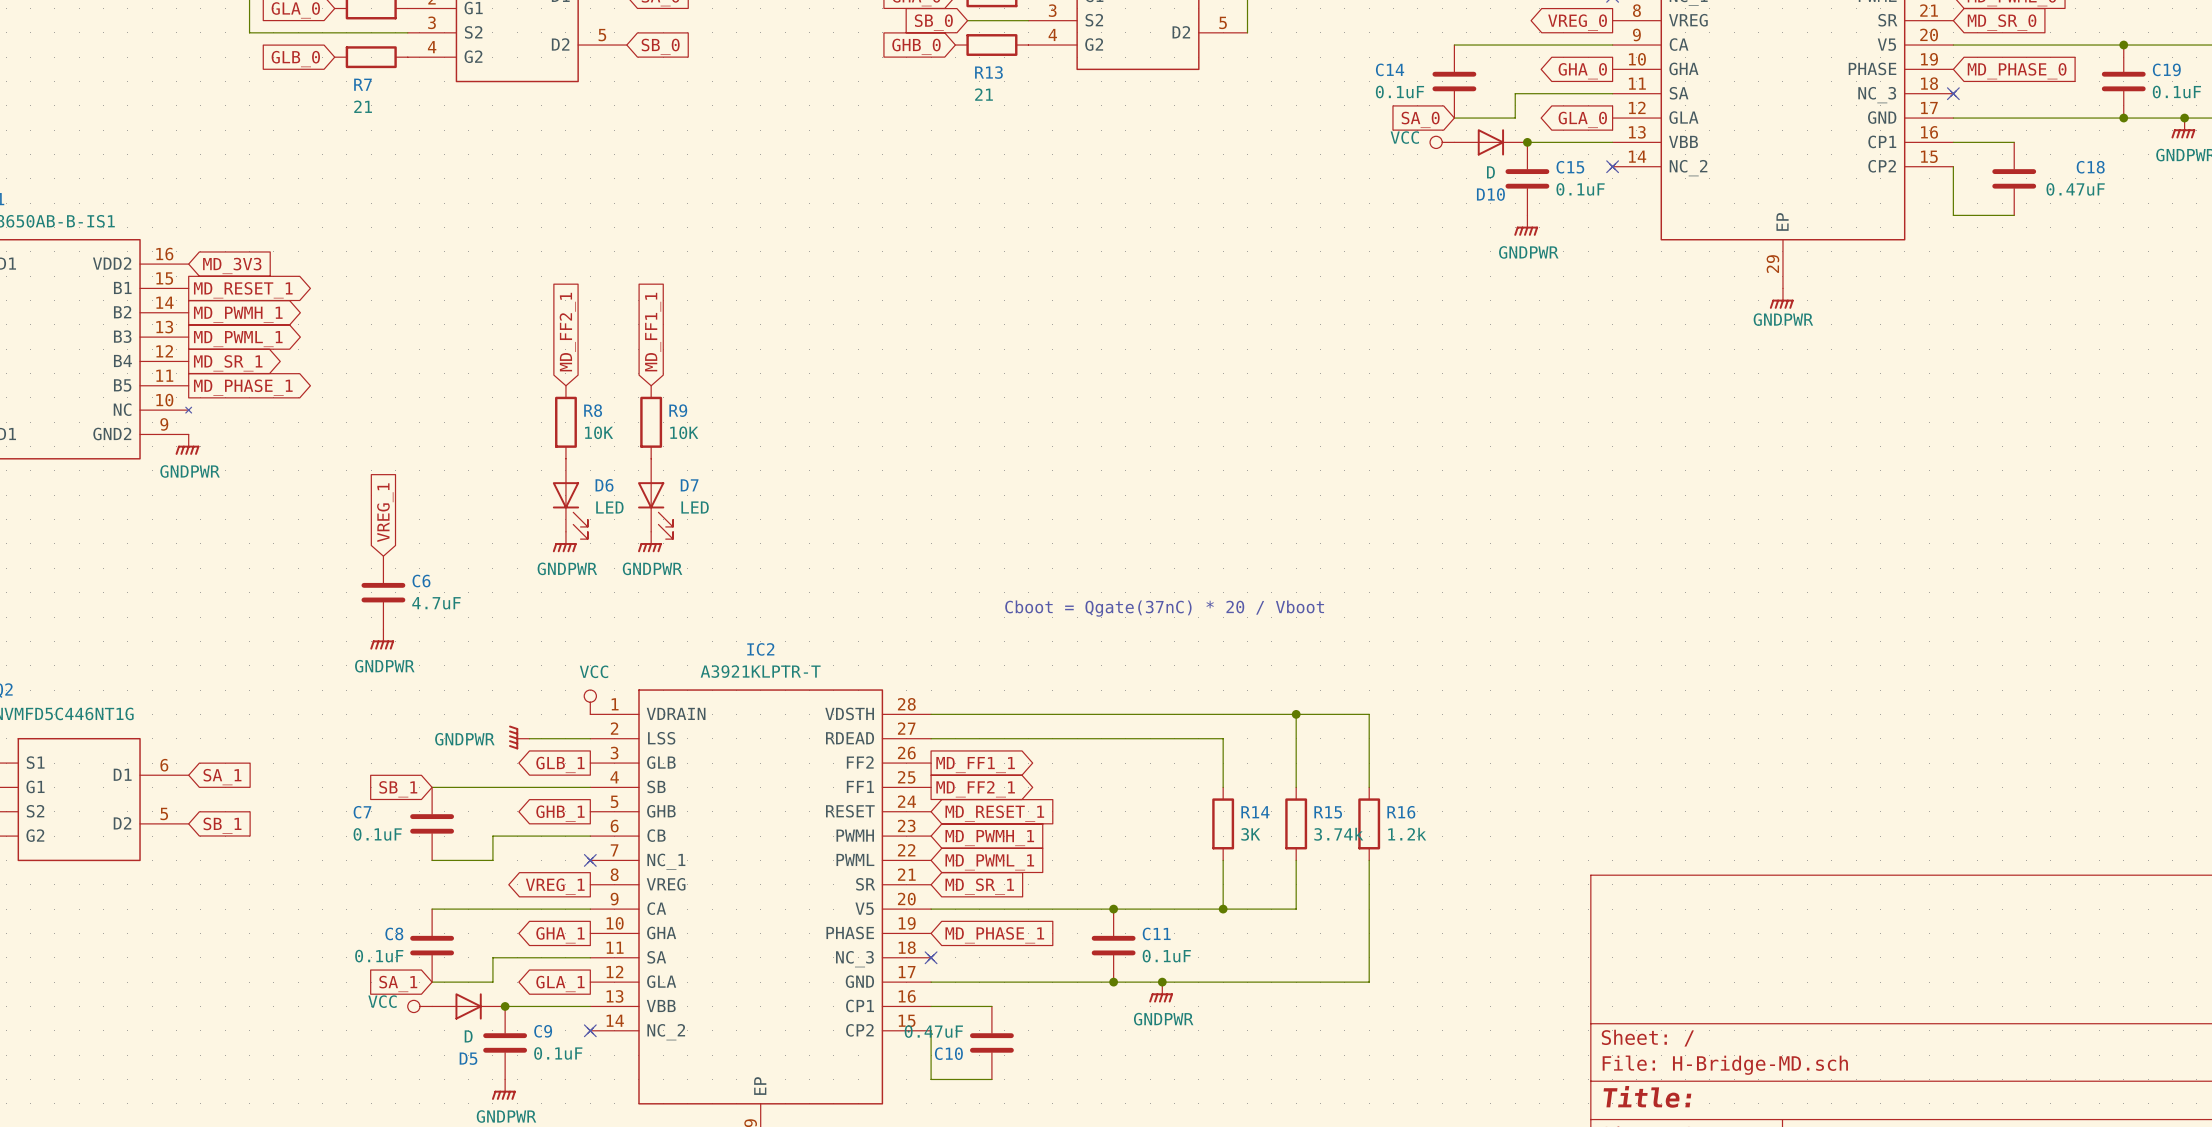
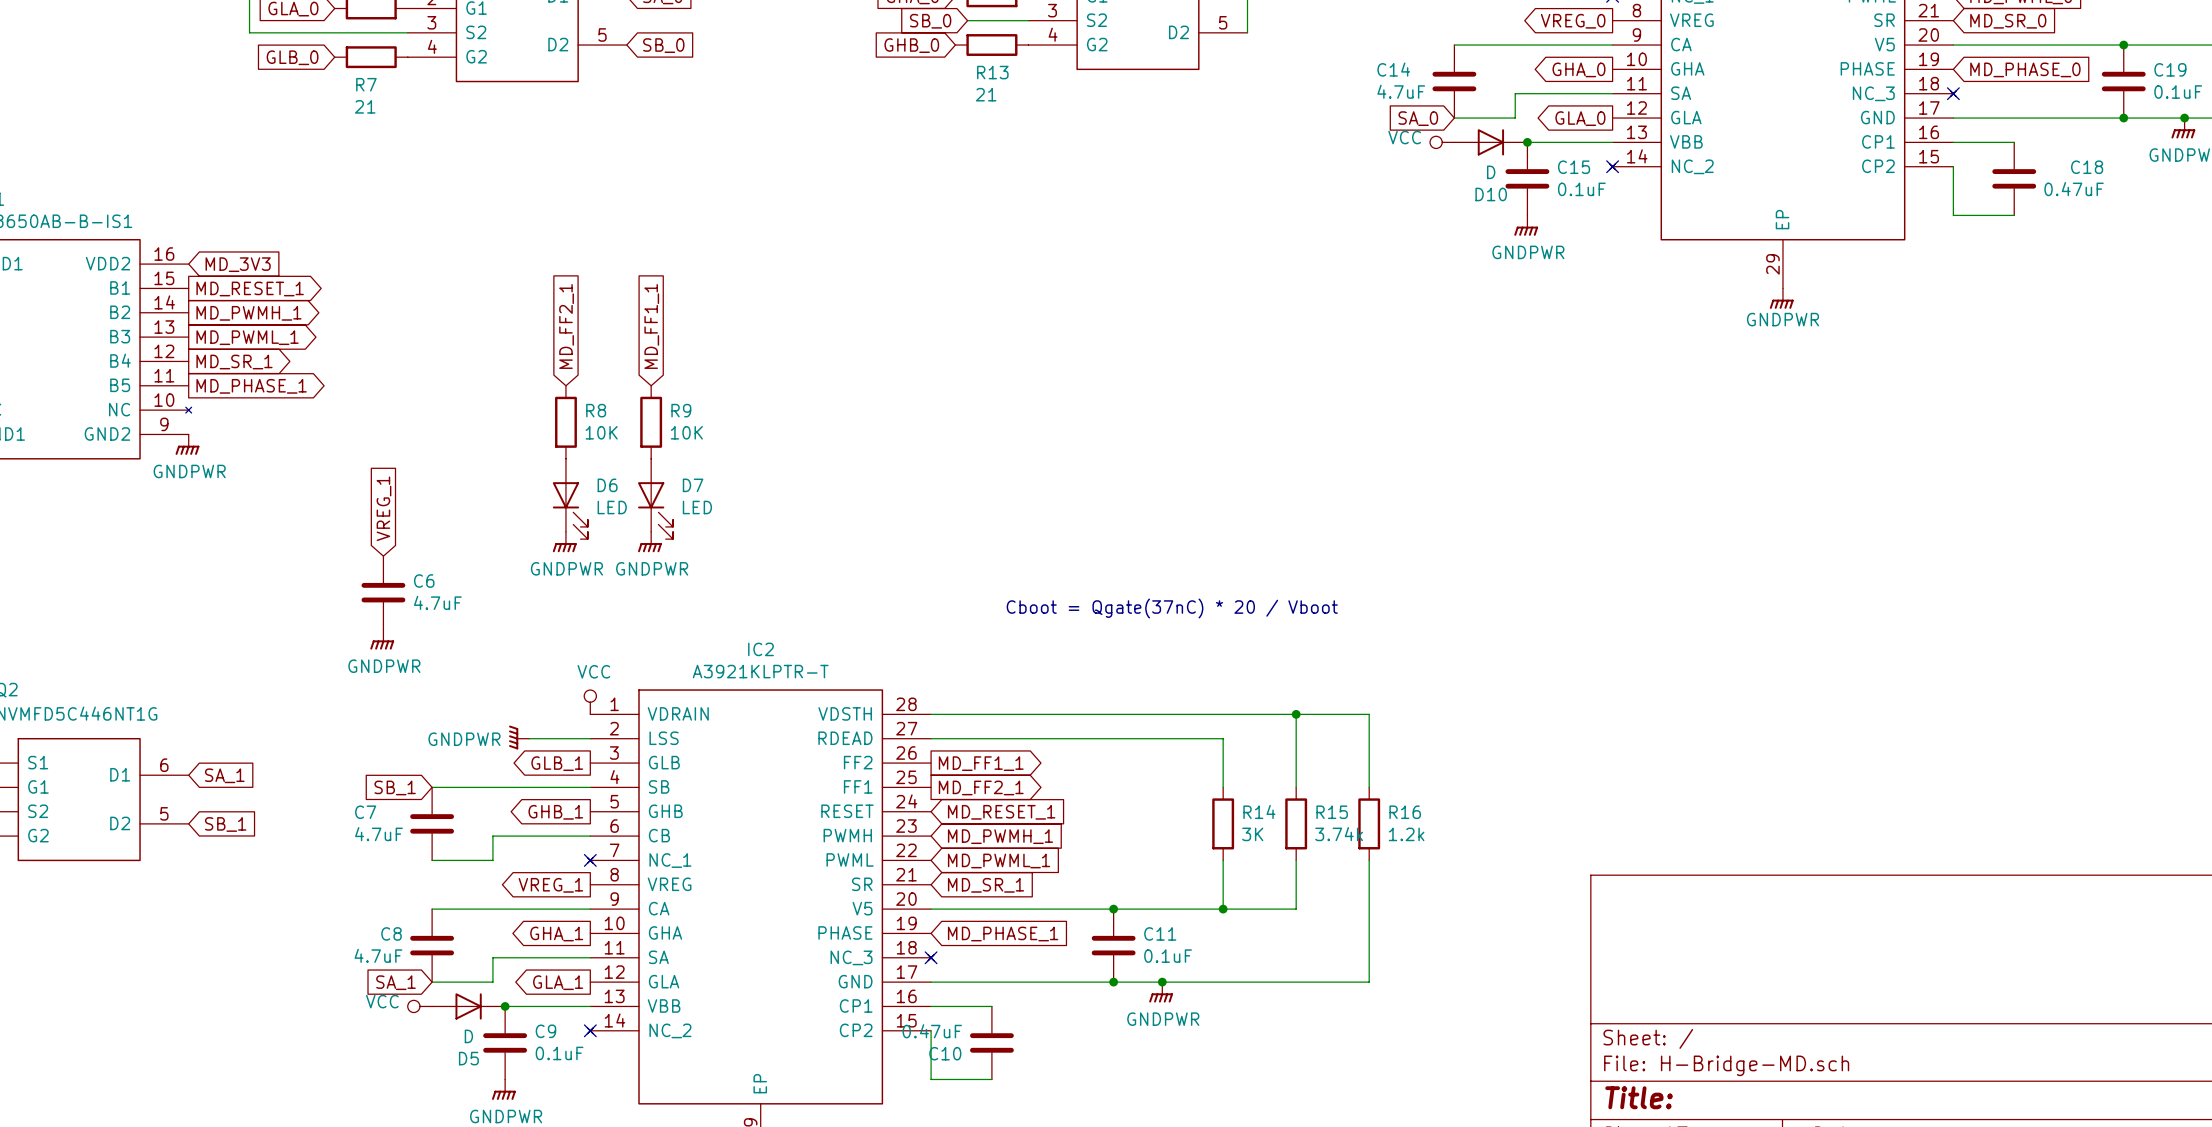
C14 value: 0.1uF (1399, 92) -> 4.7uF (1401, 91)
C7 value: 0.1uF (377, 834) -> 4.7uF (378, 834)
C8 value: 0.1uF (379, 956) -> 4.7uF (378, 955)

